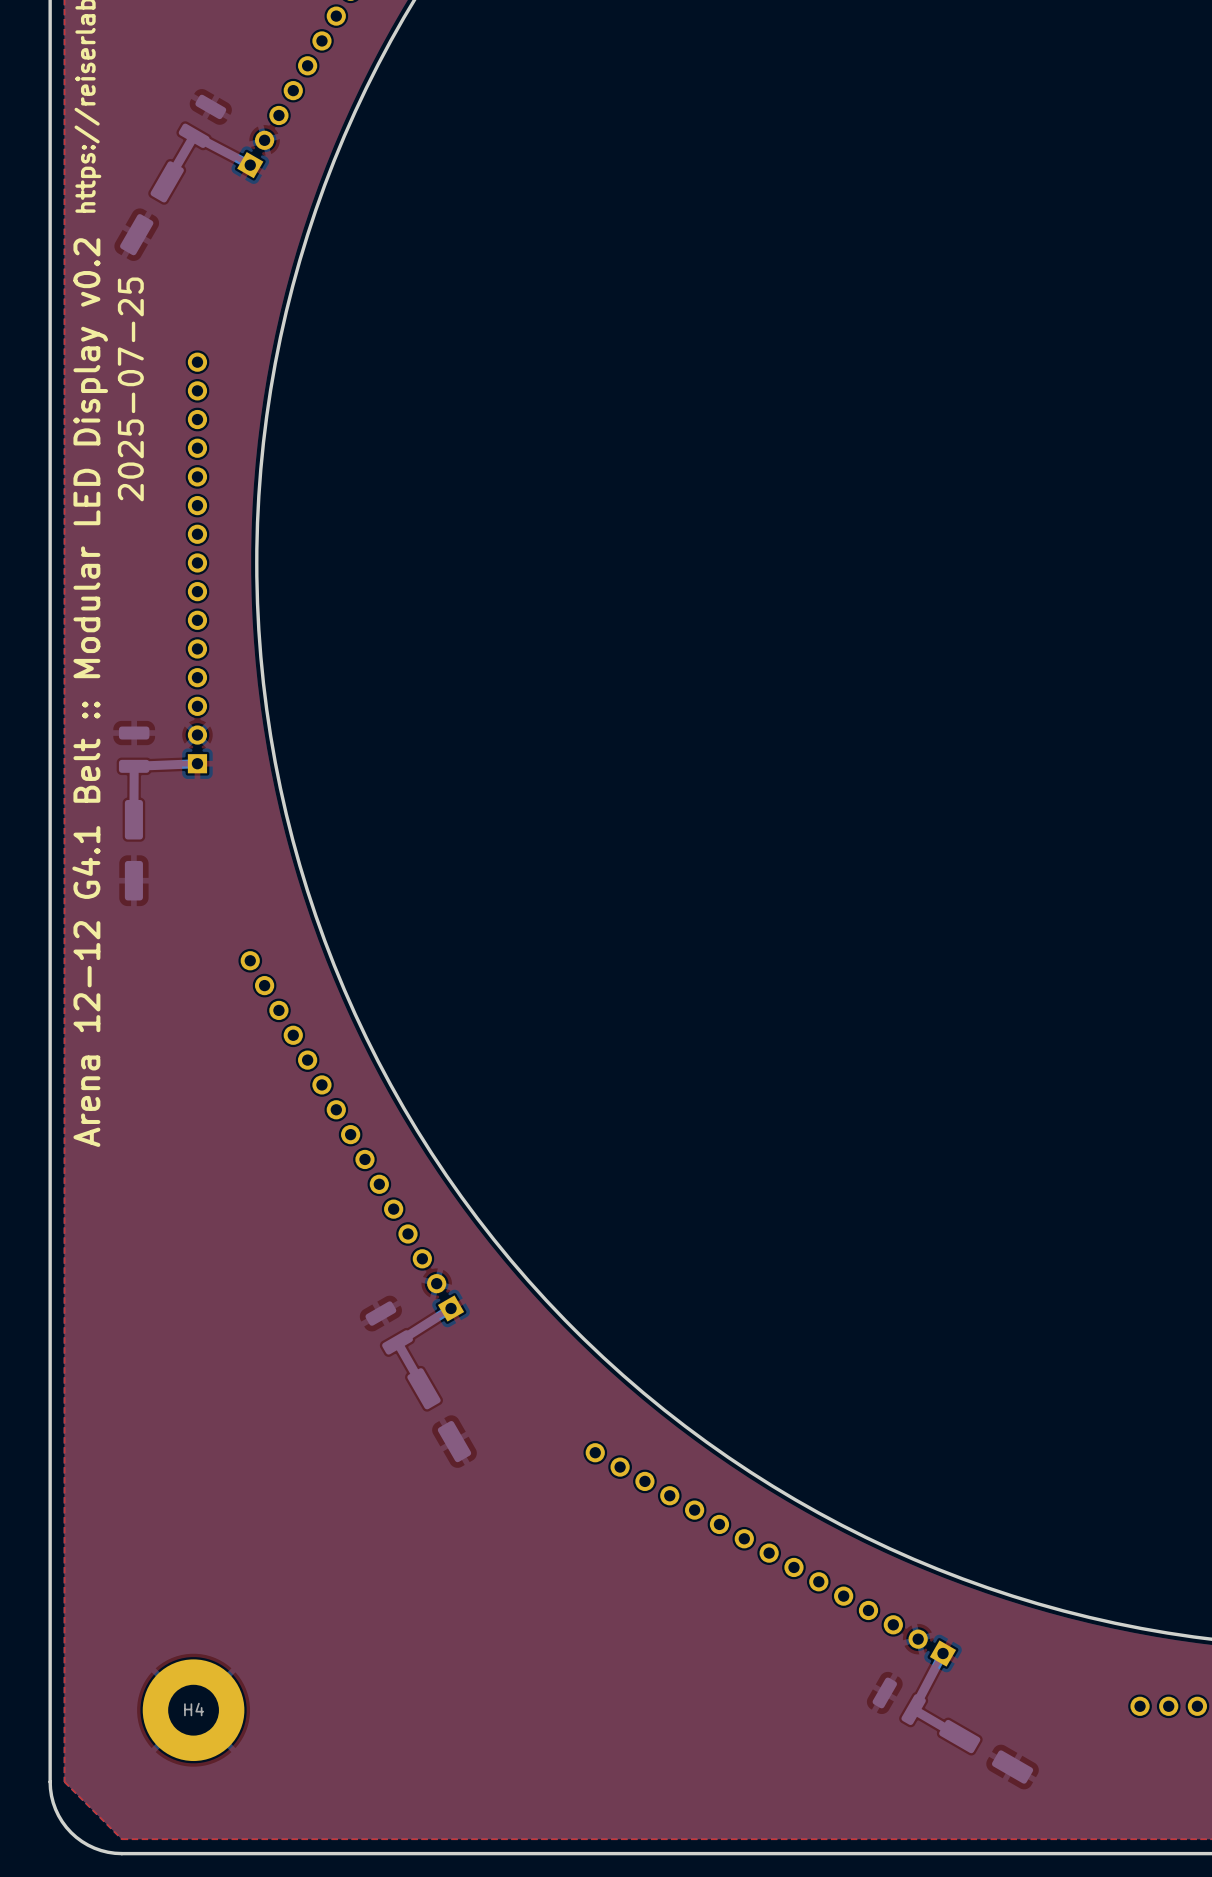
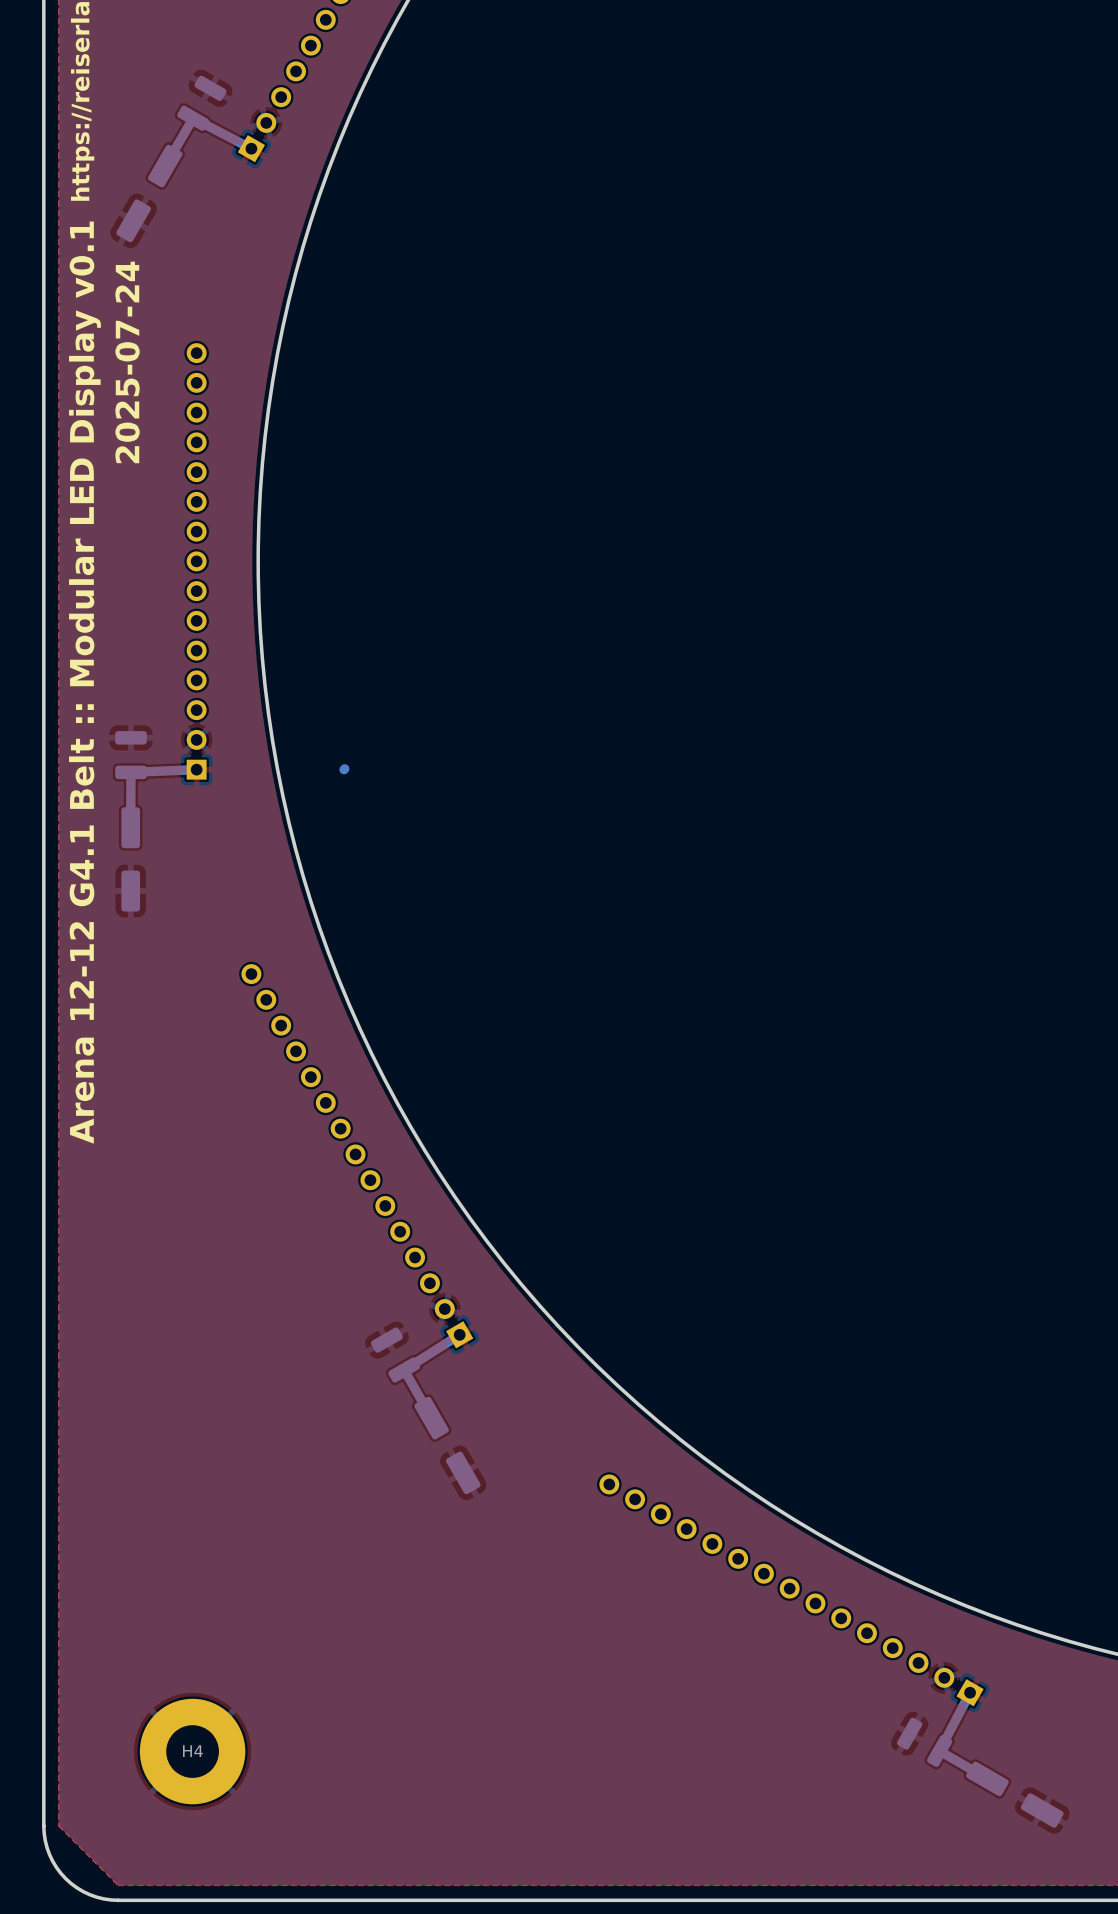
text: 2025-07-25 (130, 389) -> 2025-07-24 (127, 362)
text: Arena 12-12 G4.1 Belt :: Modular LED Display v0.2 (90, 692) -> Arena 12-12 G4.1 Belt :: Modular LED Display v0.1 (84, 682)
bottom track: none -> (344, 768) (344, 769)

